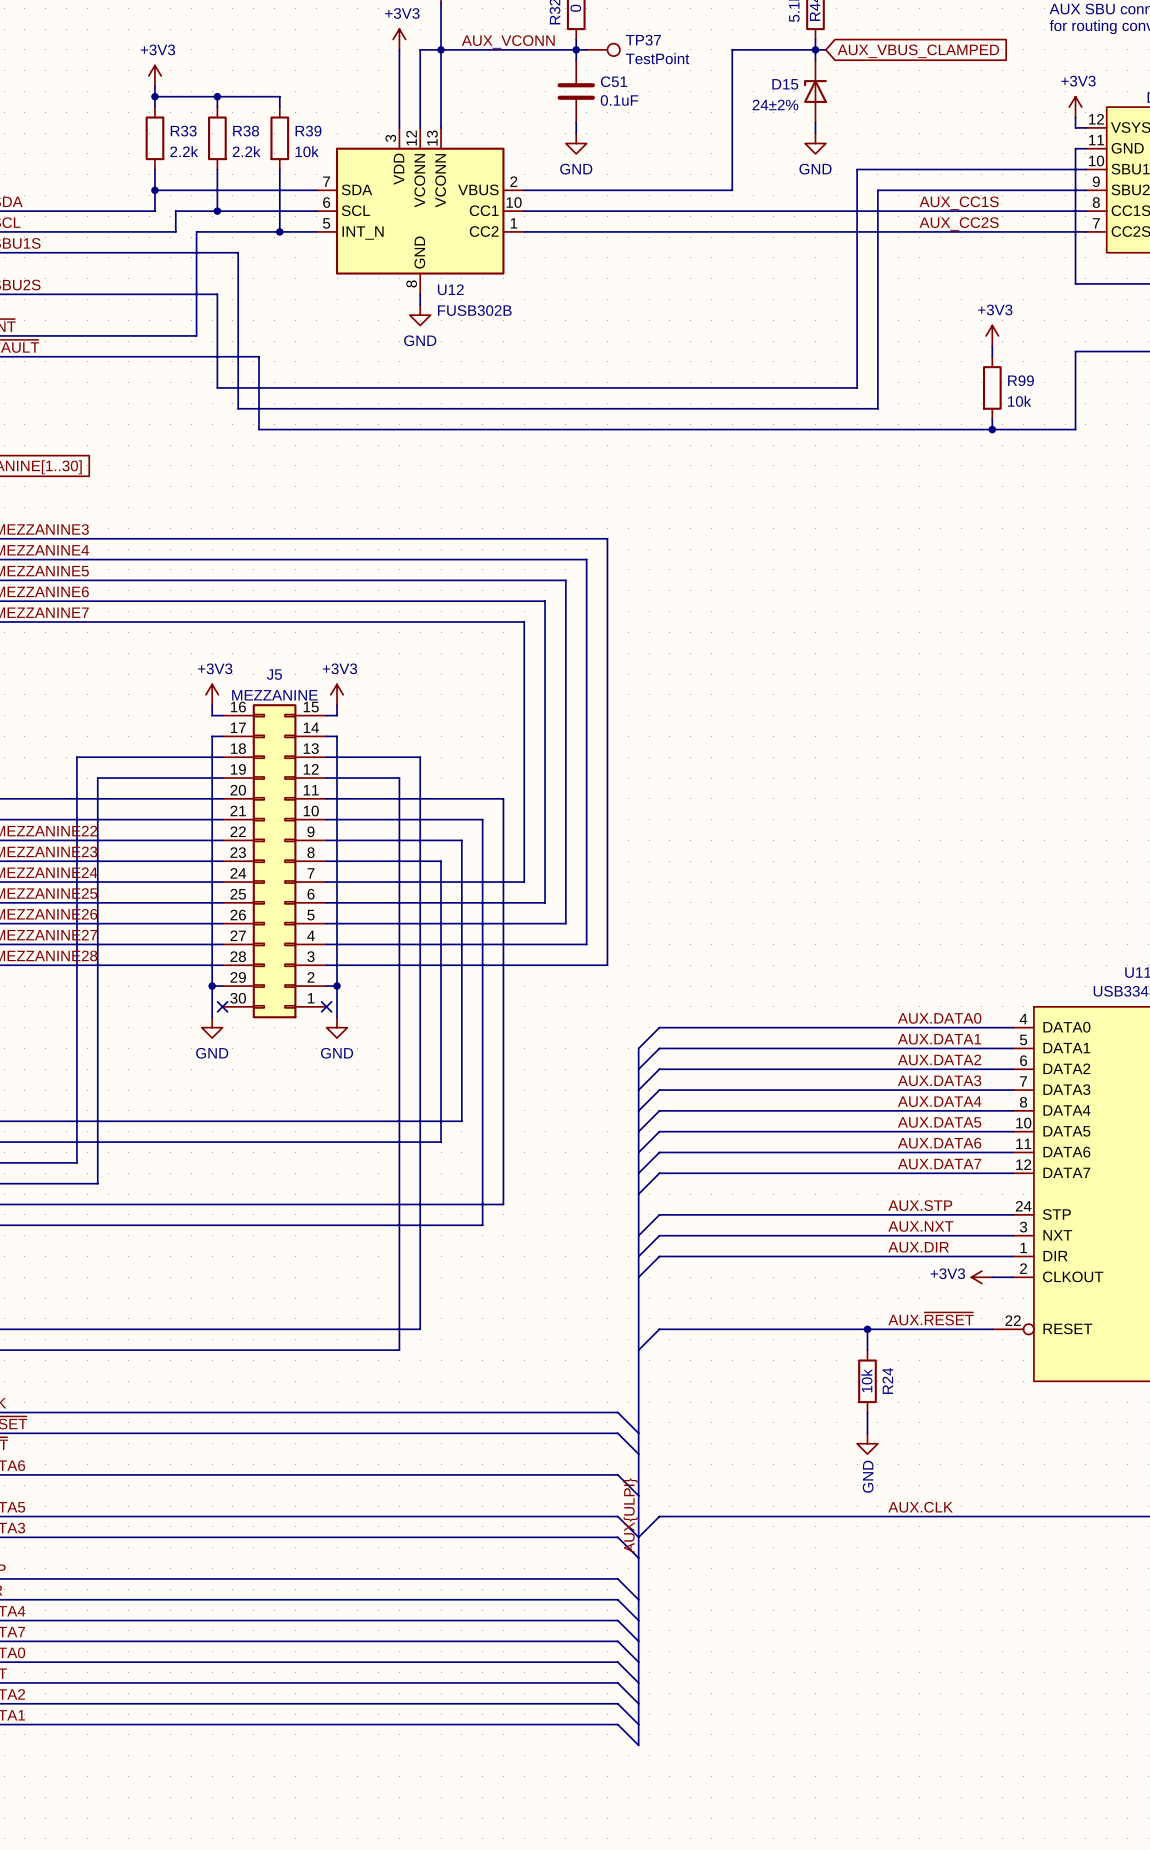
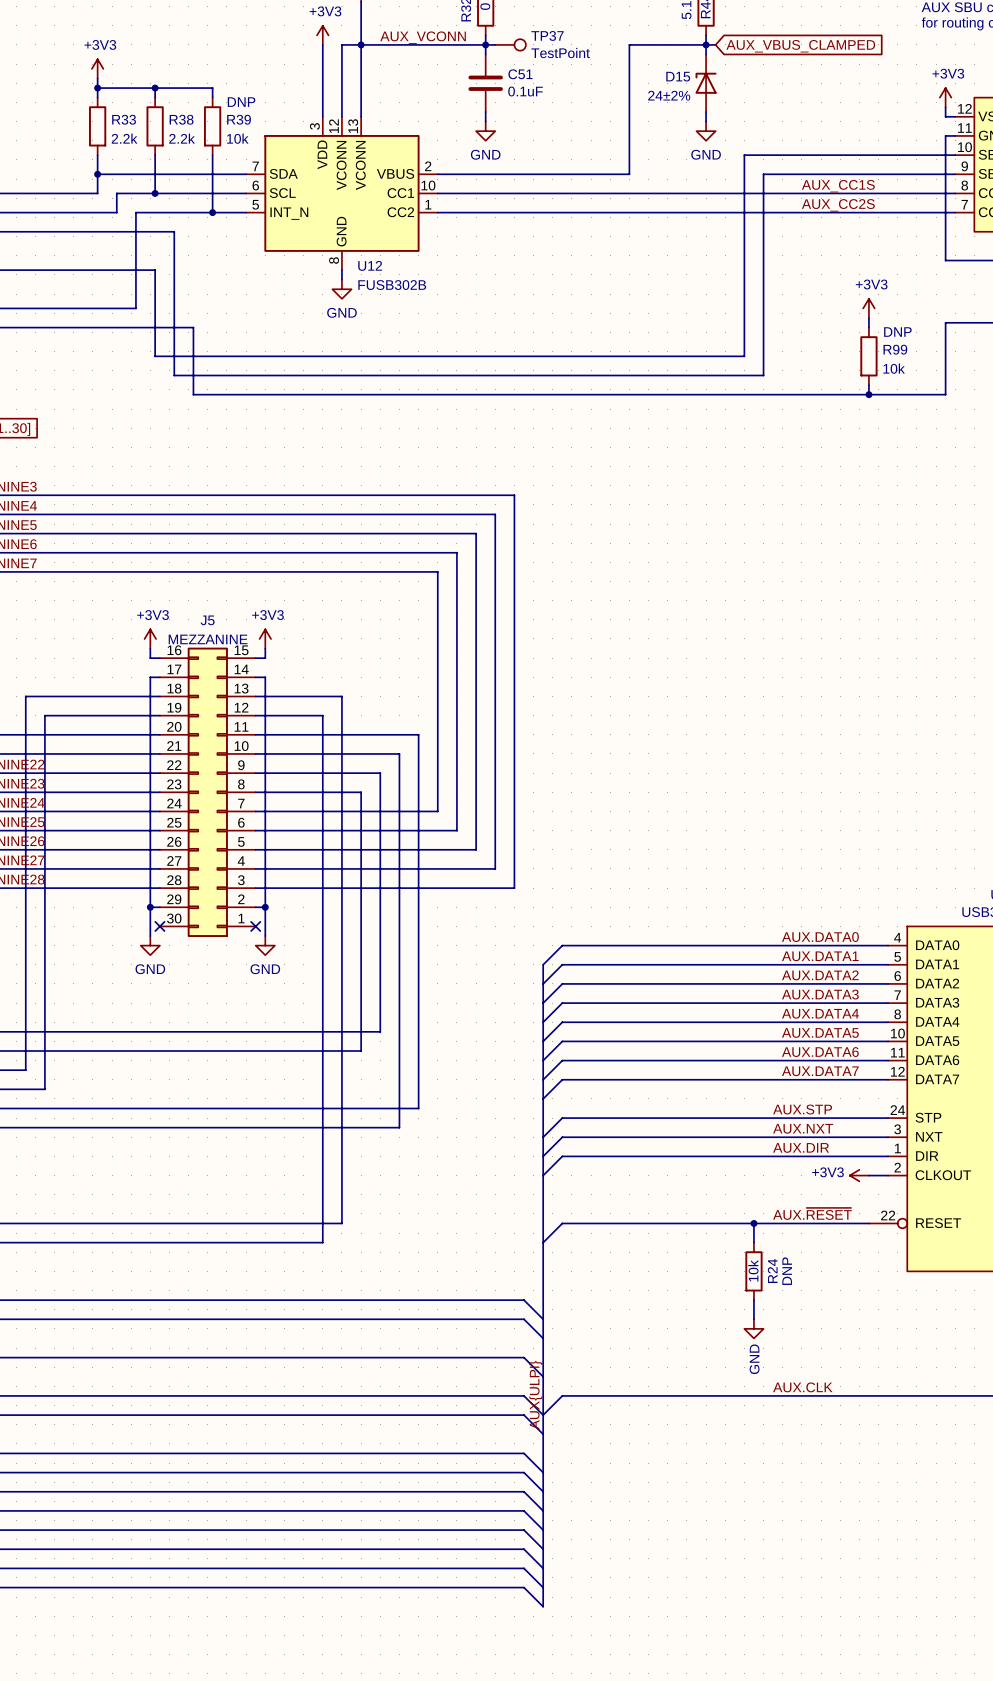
R39 text: none -> DNP (241, 102)
R99 text: none -> DNP (897, 332)
R24 text: none -> DNP (787, 1271)

